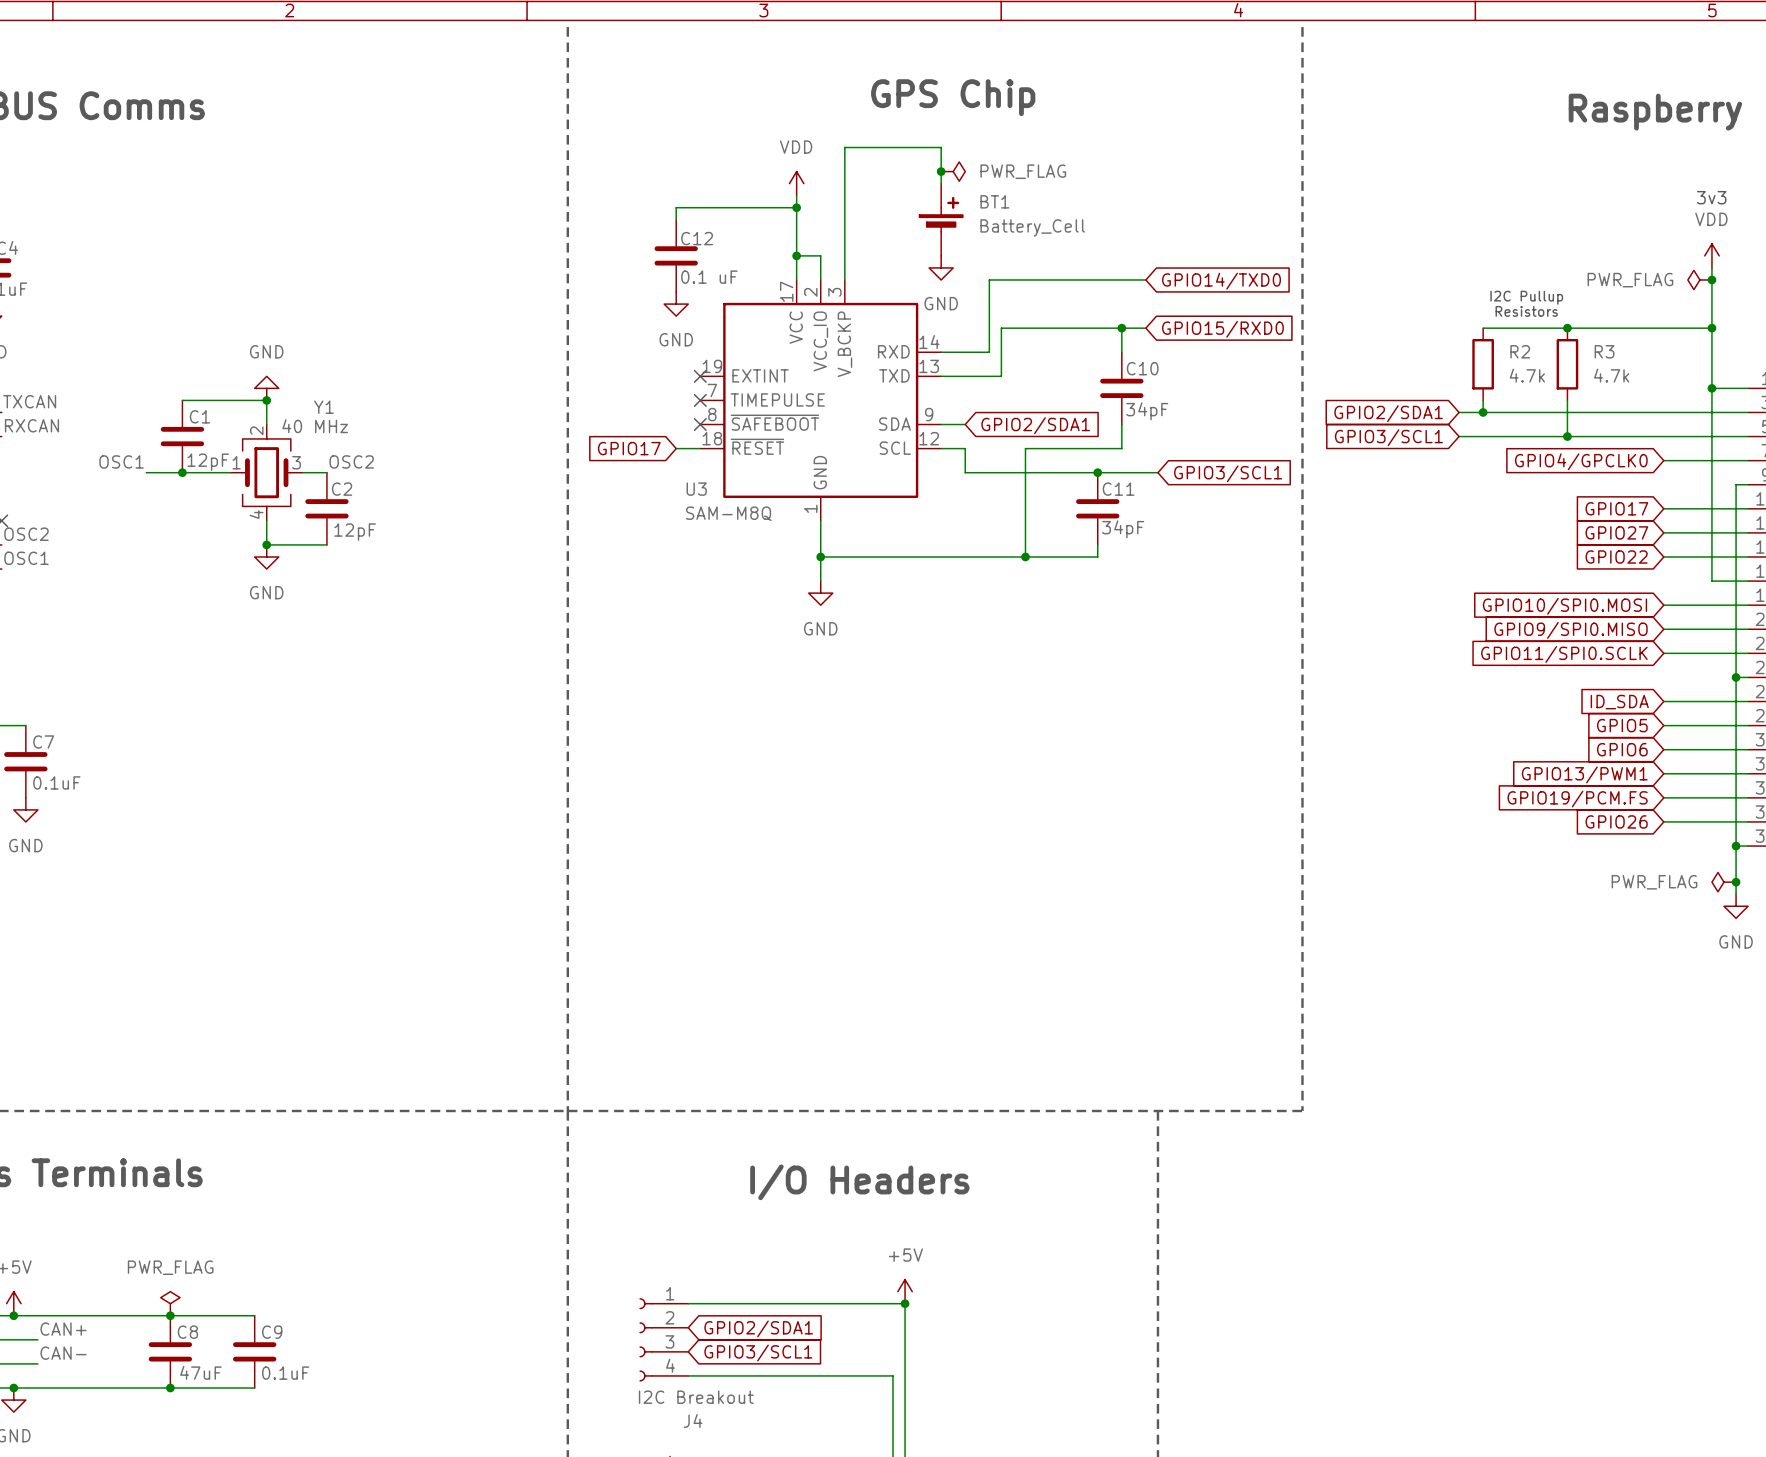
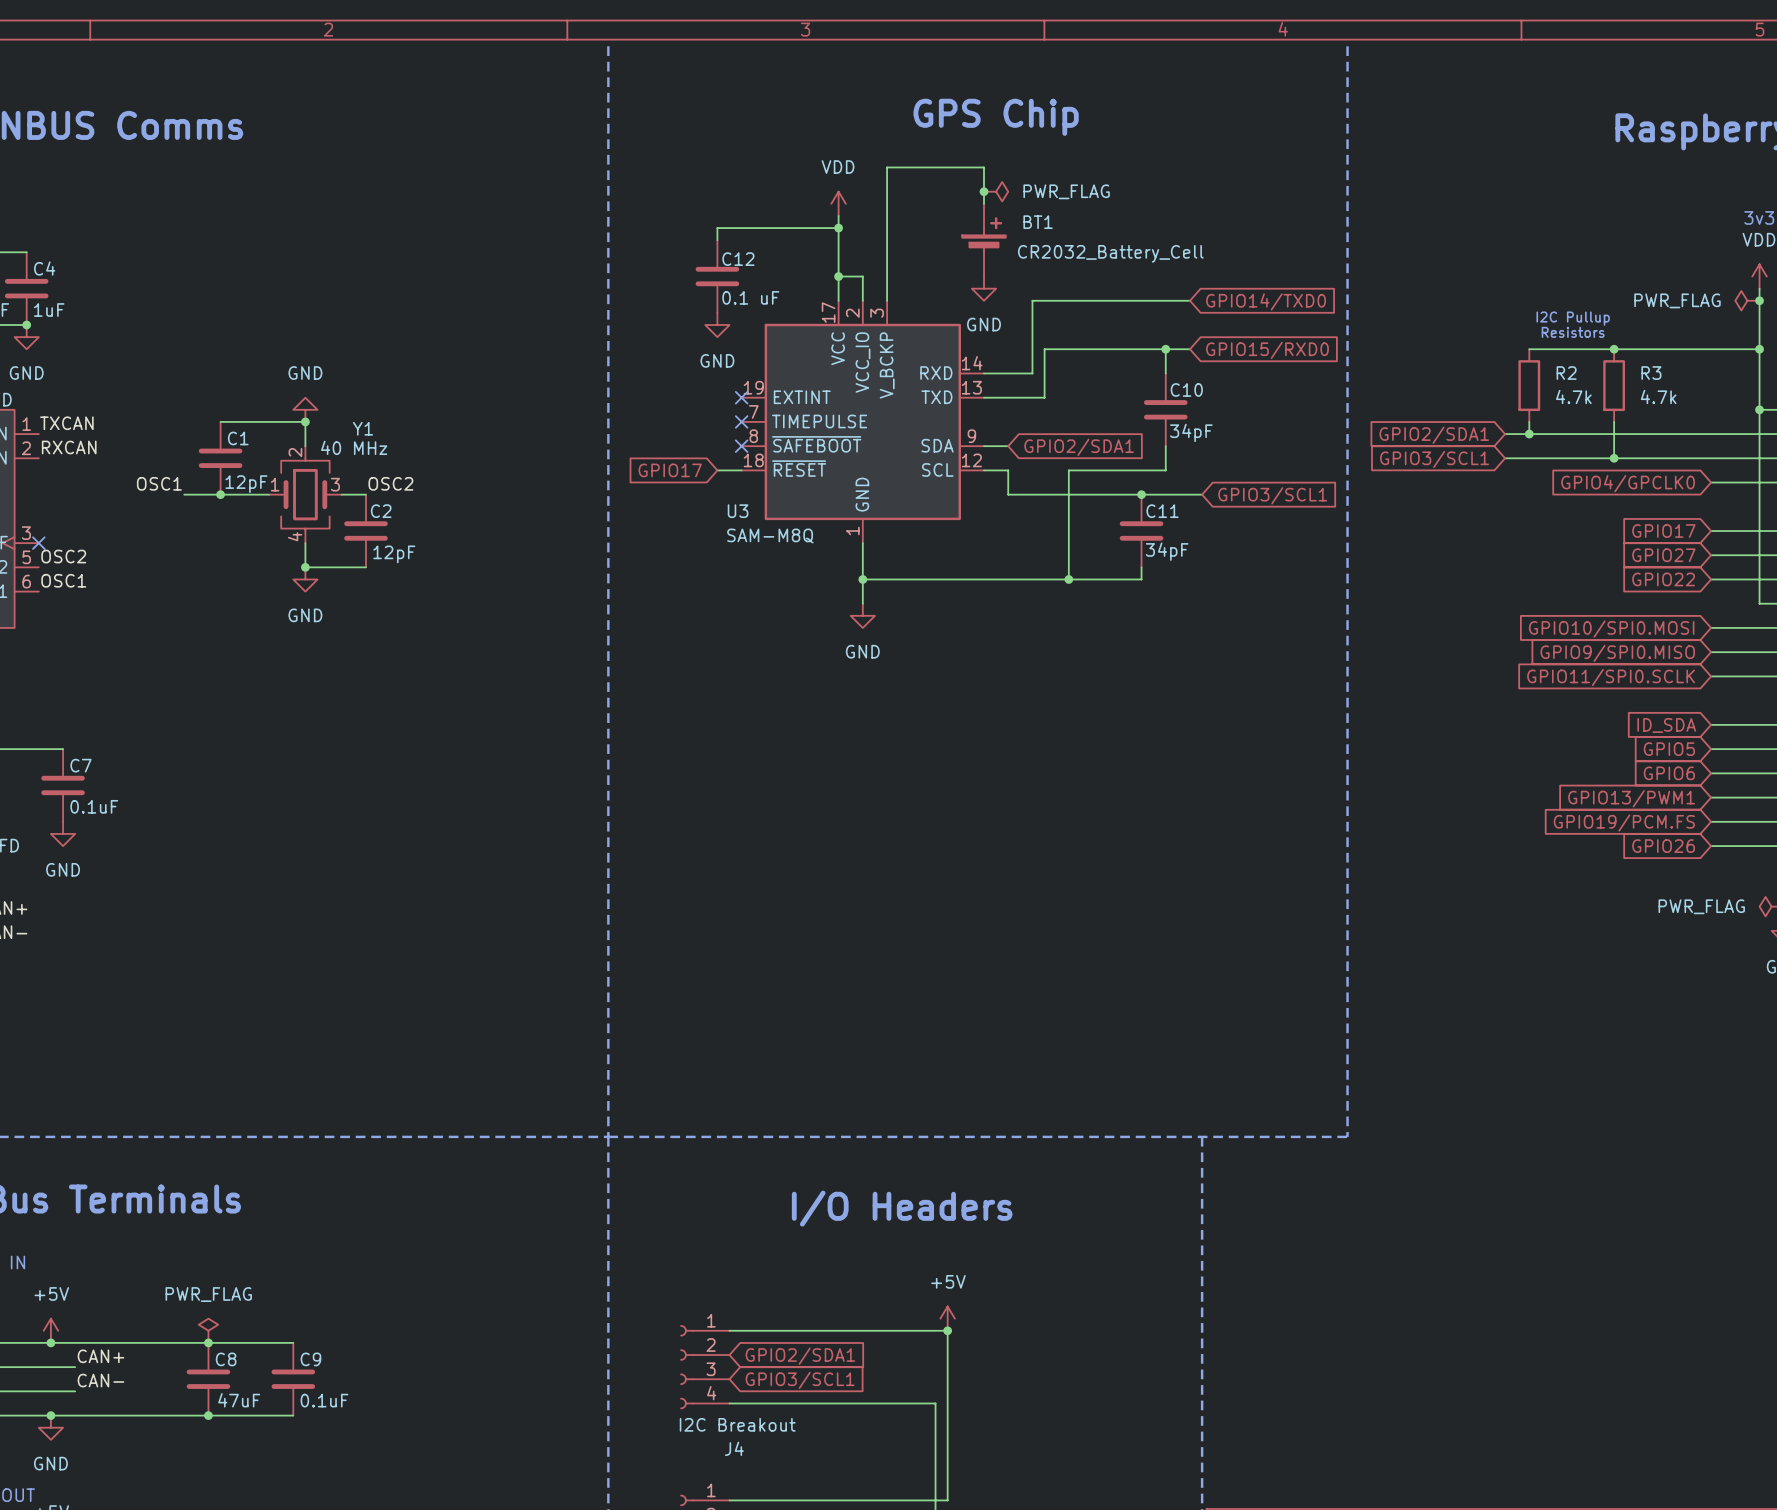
BT1 value: Battery_Cell (1032, 227) -> CR2032_Battery_Cell (1110, 253)

